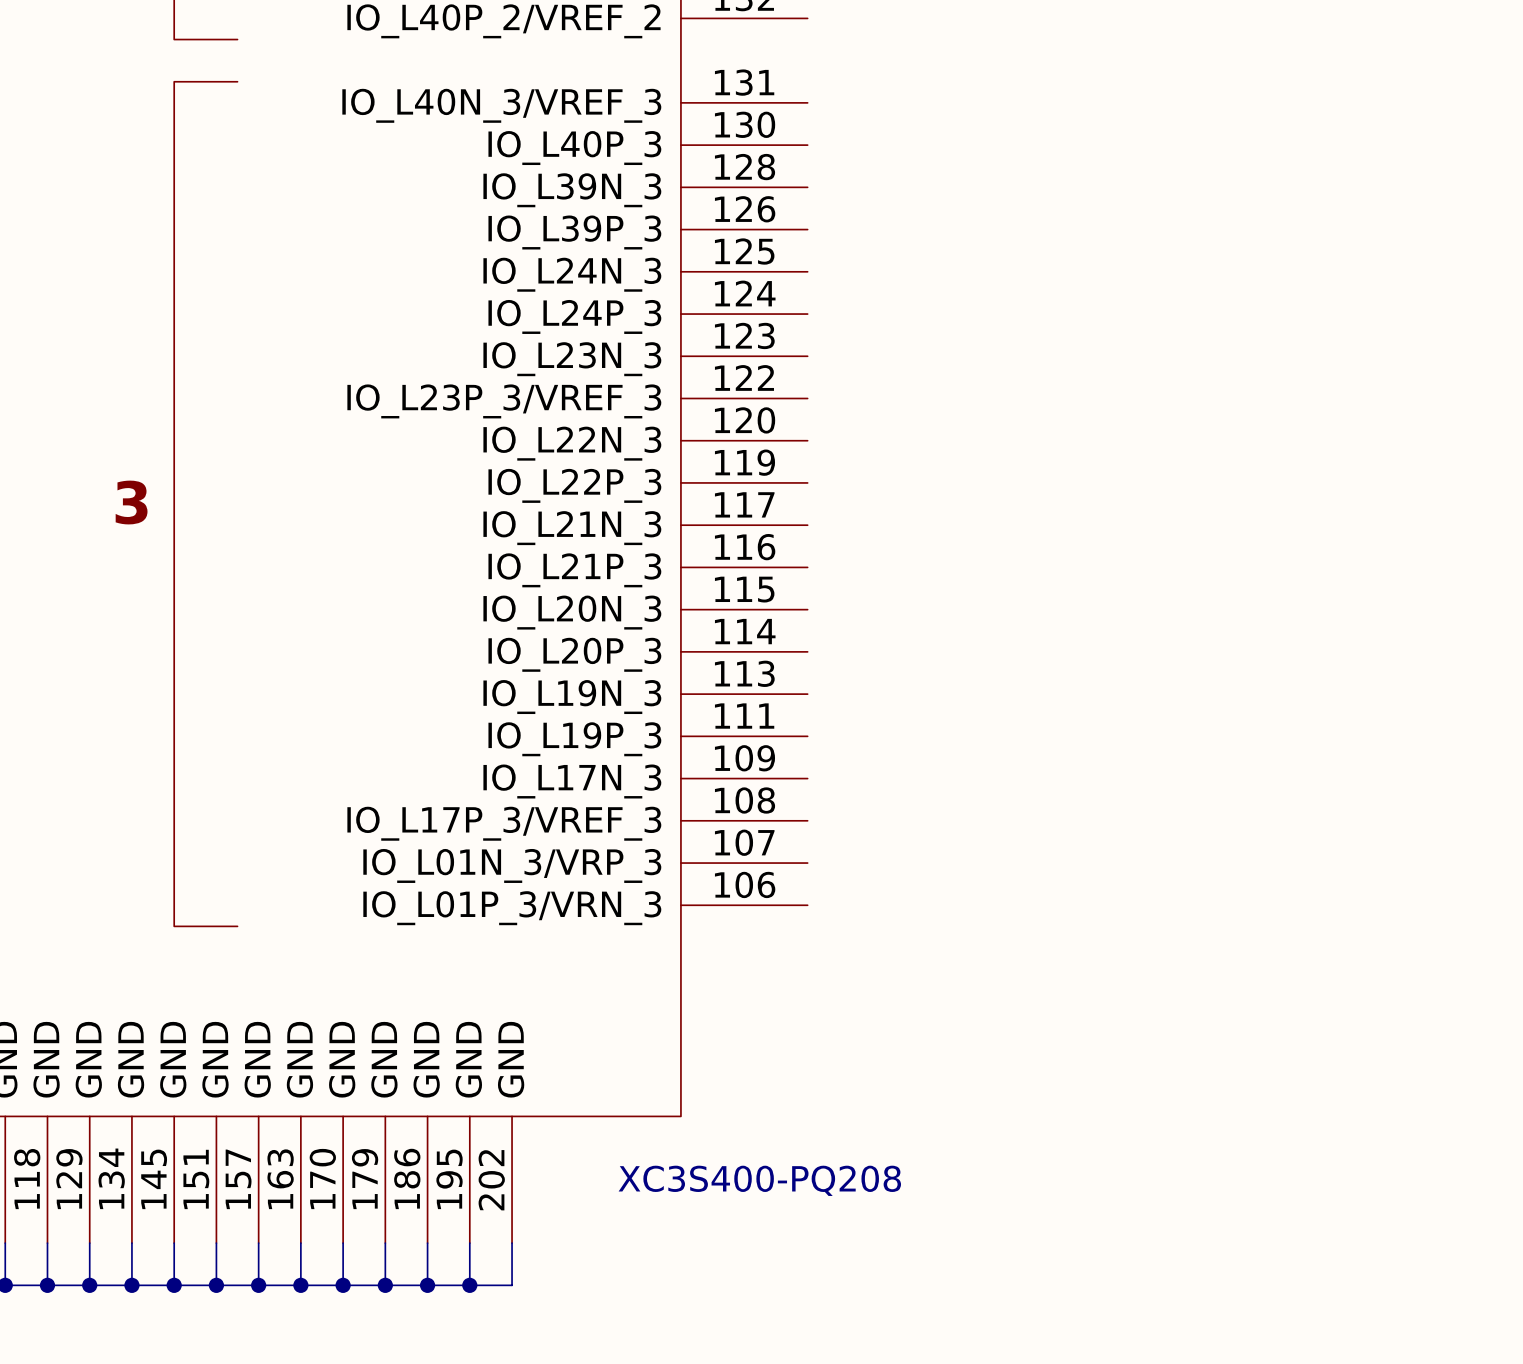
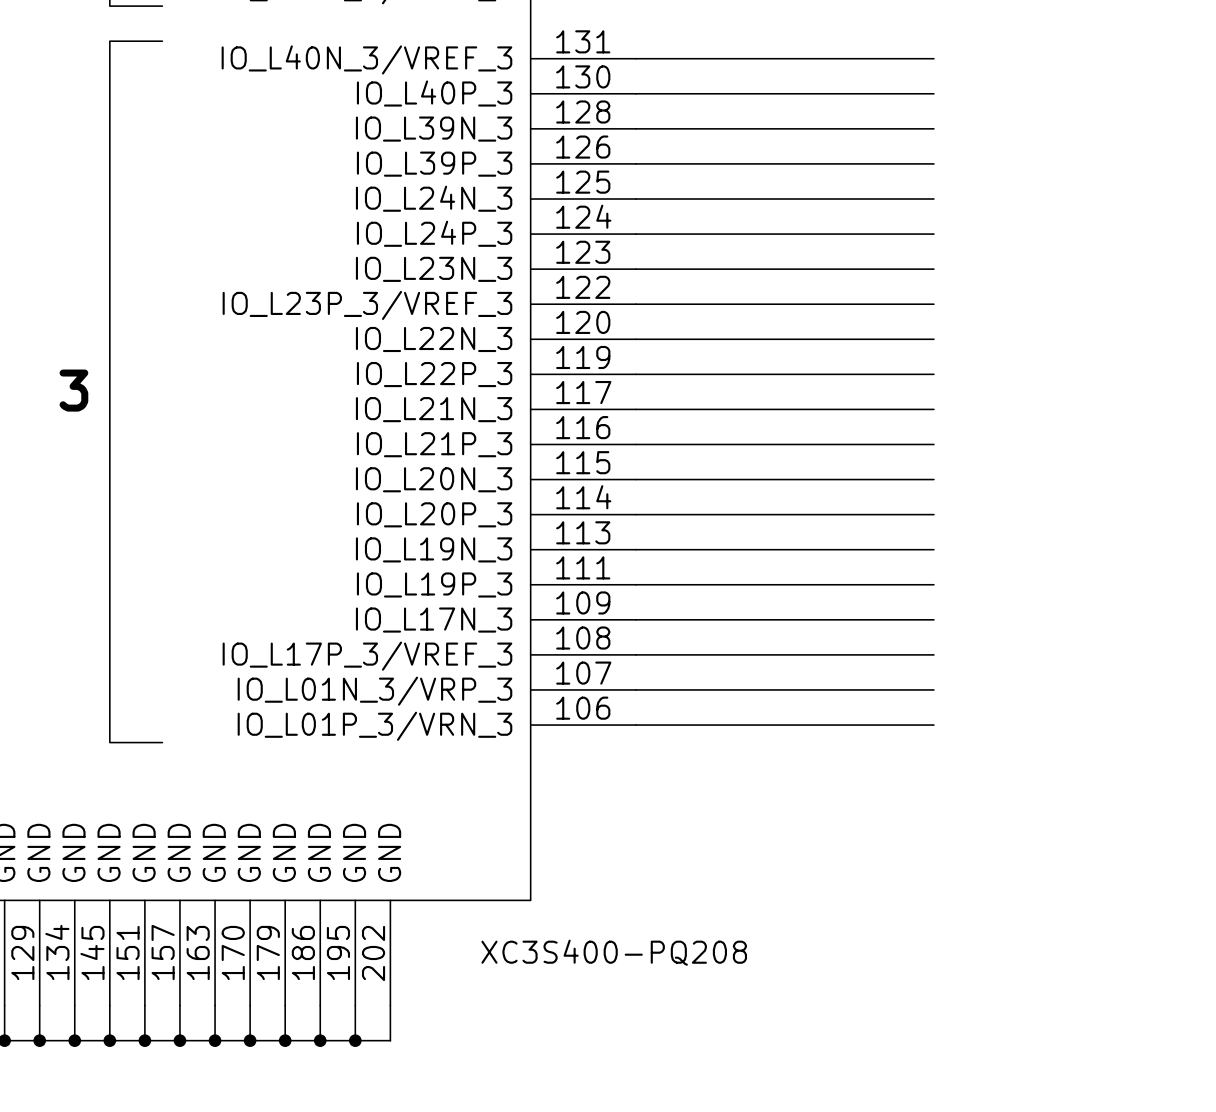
wire: none -> (635, 58) (933, 58)
wire: none -> (635, 93) (933, 93)
wire: none -> (635, 128) (933, 128)
wire: none -> (635, 163) (933, 163)
wire: none -> (635, 198) (933, 198)
wire: none -> (635, 234) (933, 234)
wire: none -> (635, 269) (933, 269)
wire: none -> (635, 304) (933, 304)
wire: none -> (635, 339) (933, 339)
wire: none -> (635, 374) (933, 374)
wire: none -> (635, 409) (933, 409)
wire: none -> (635, 444) (933, 444)
wire: none -> (635, 479) (933, 479)
wire: none -> (635, 514) (933, 514)
wire: none -> (635, 549) (933, 549)
wire: none -> (635, 584) (933, 584)
wire: none -> (635, 619) (933, 619)
wire: none -> (635, 654) (933, 654)
wire: none -> (635, 689) (933, 689)
wire: none -> (635, 725) (933, 725)

